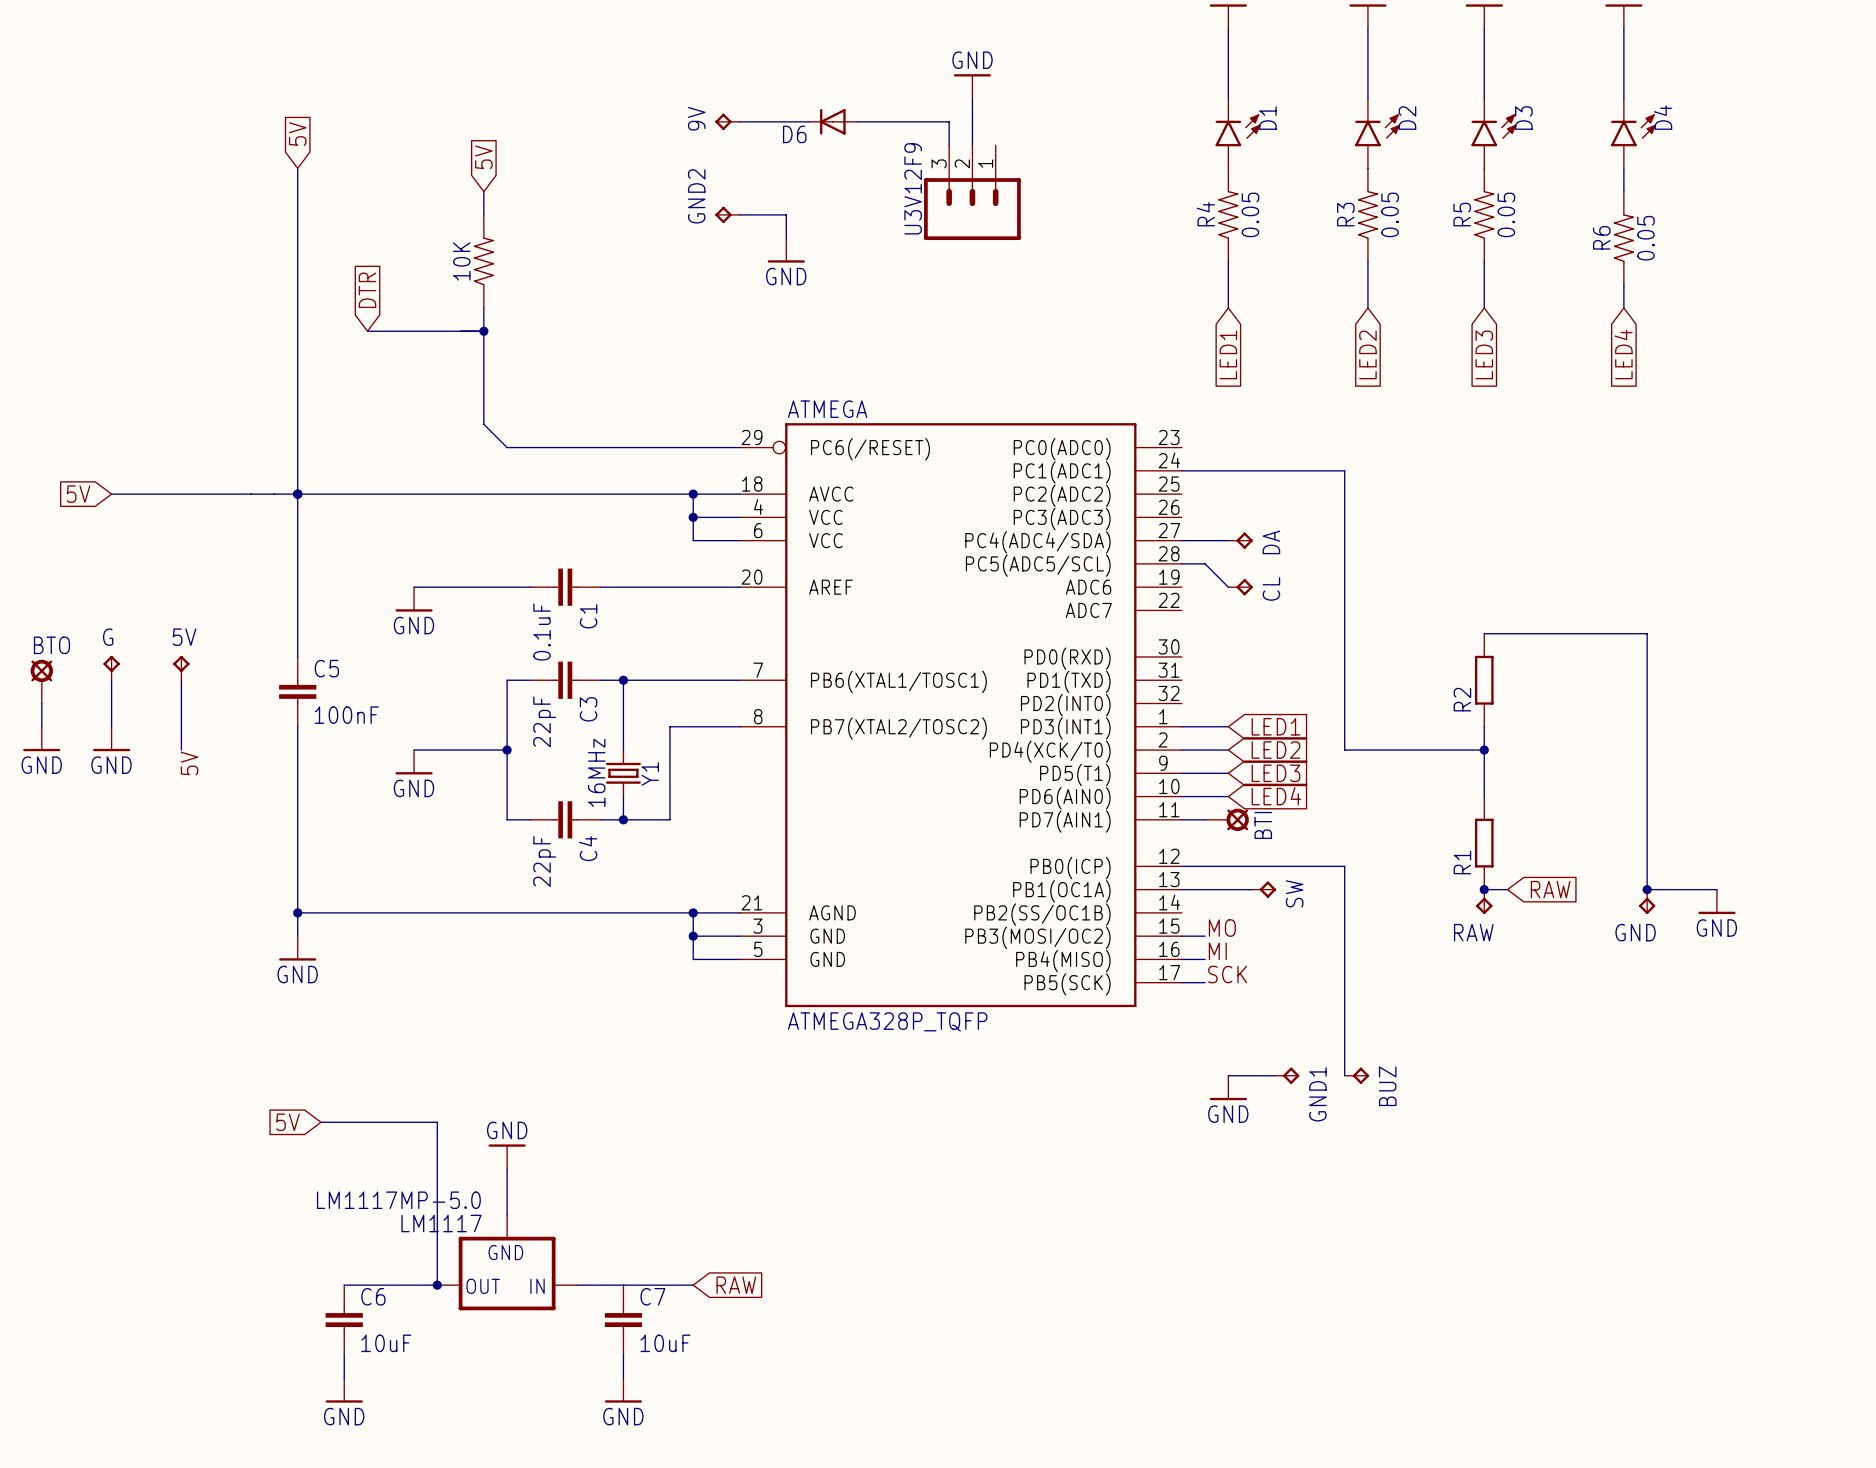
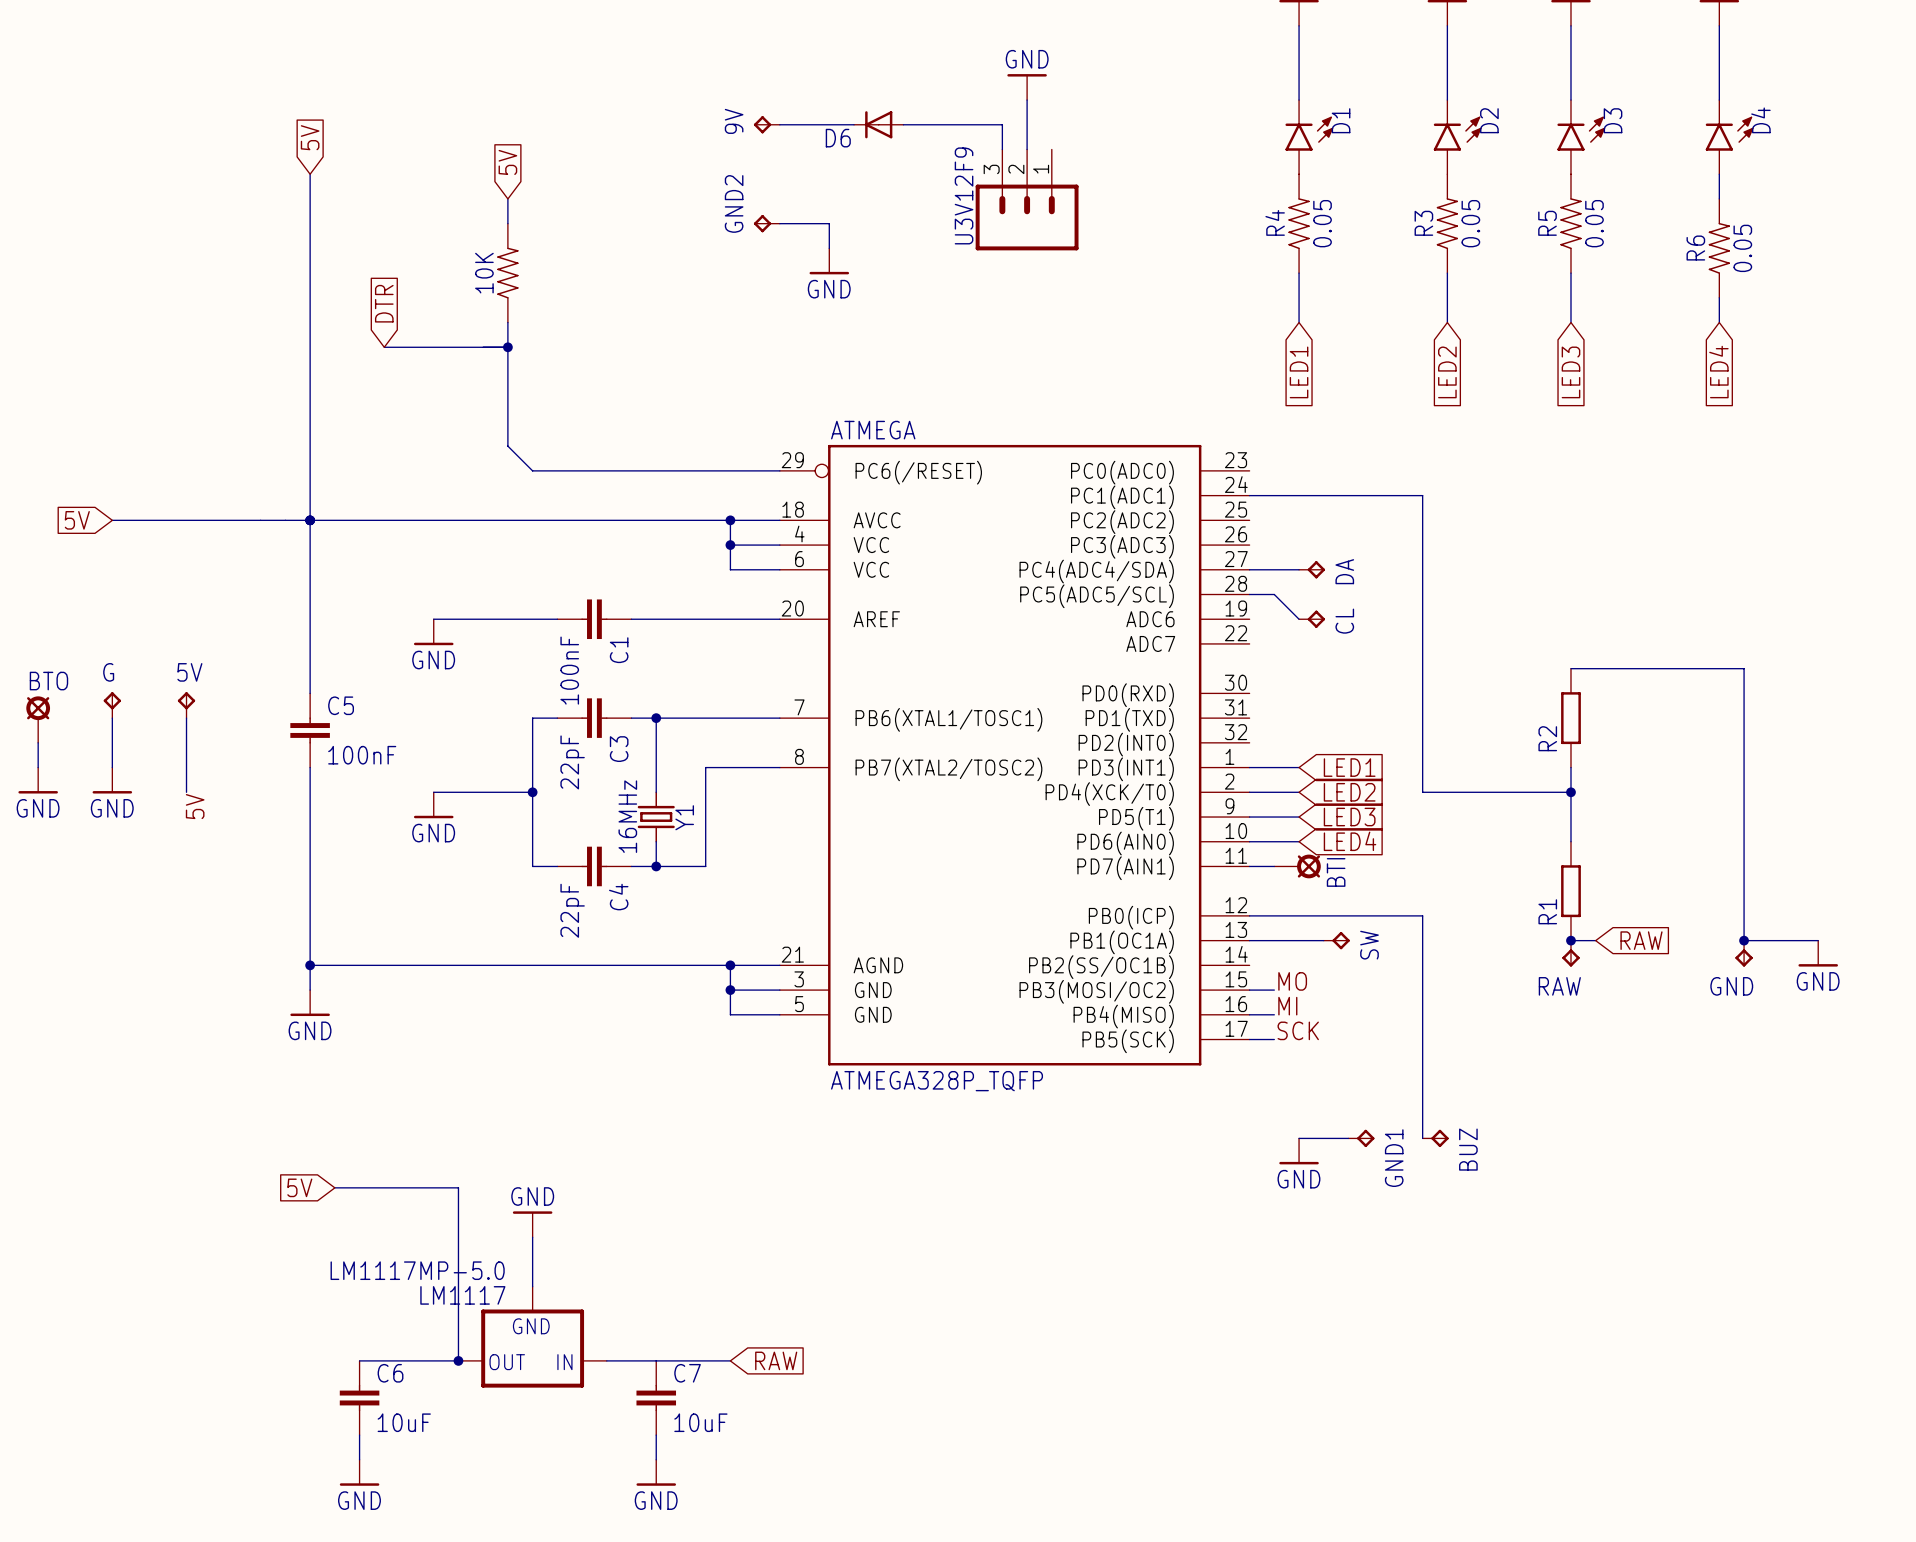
C1 value: 0.1uF (542, 632) -> 100nF (569, 670)

